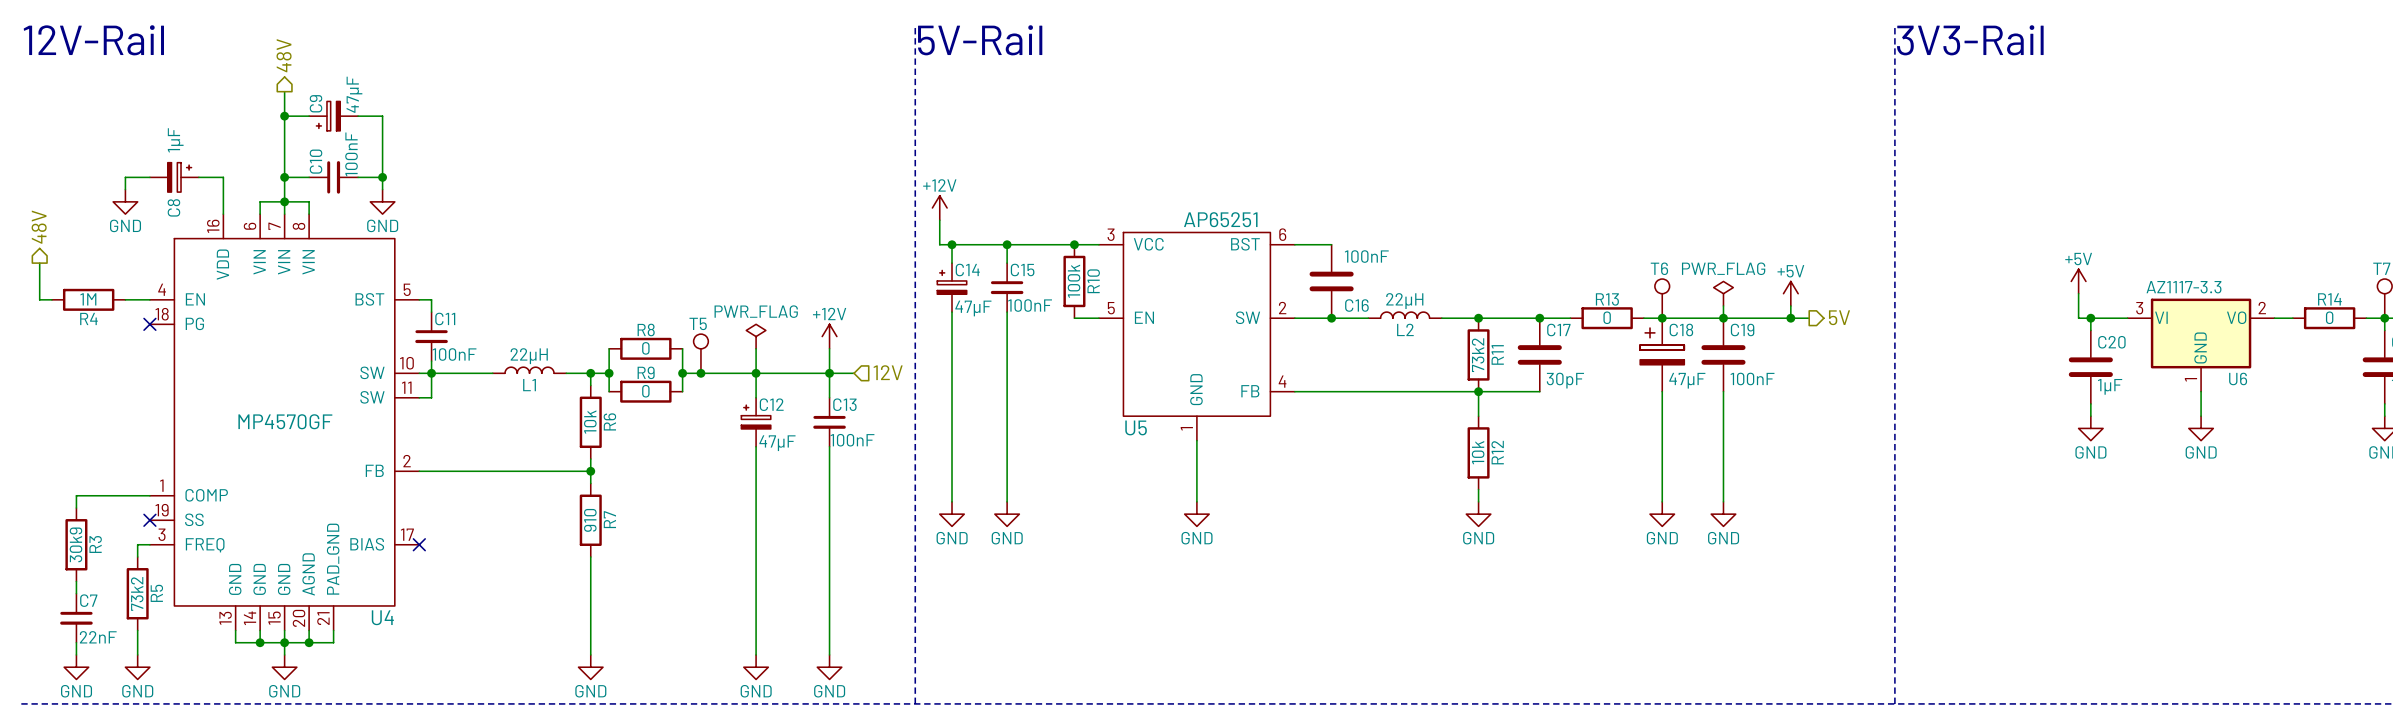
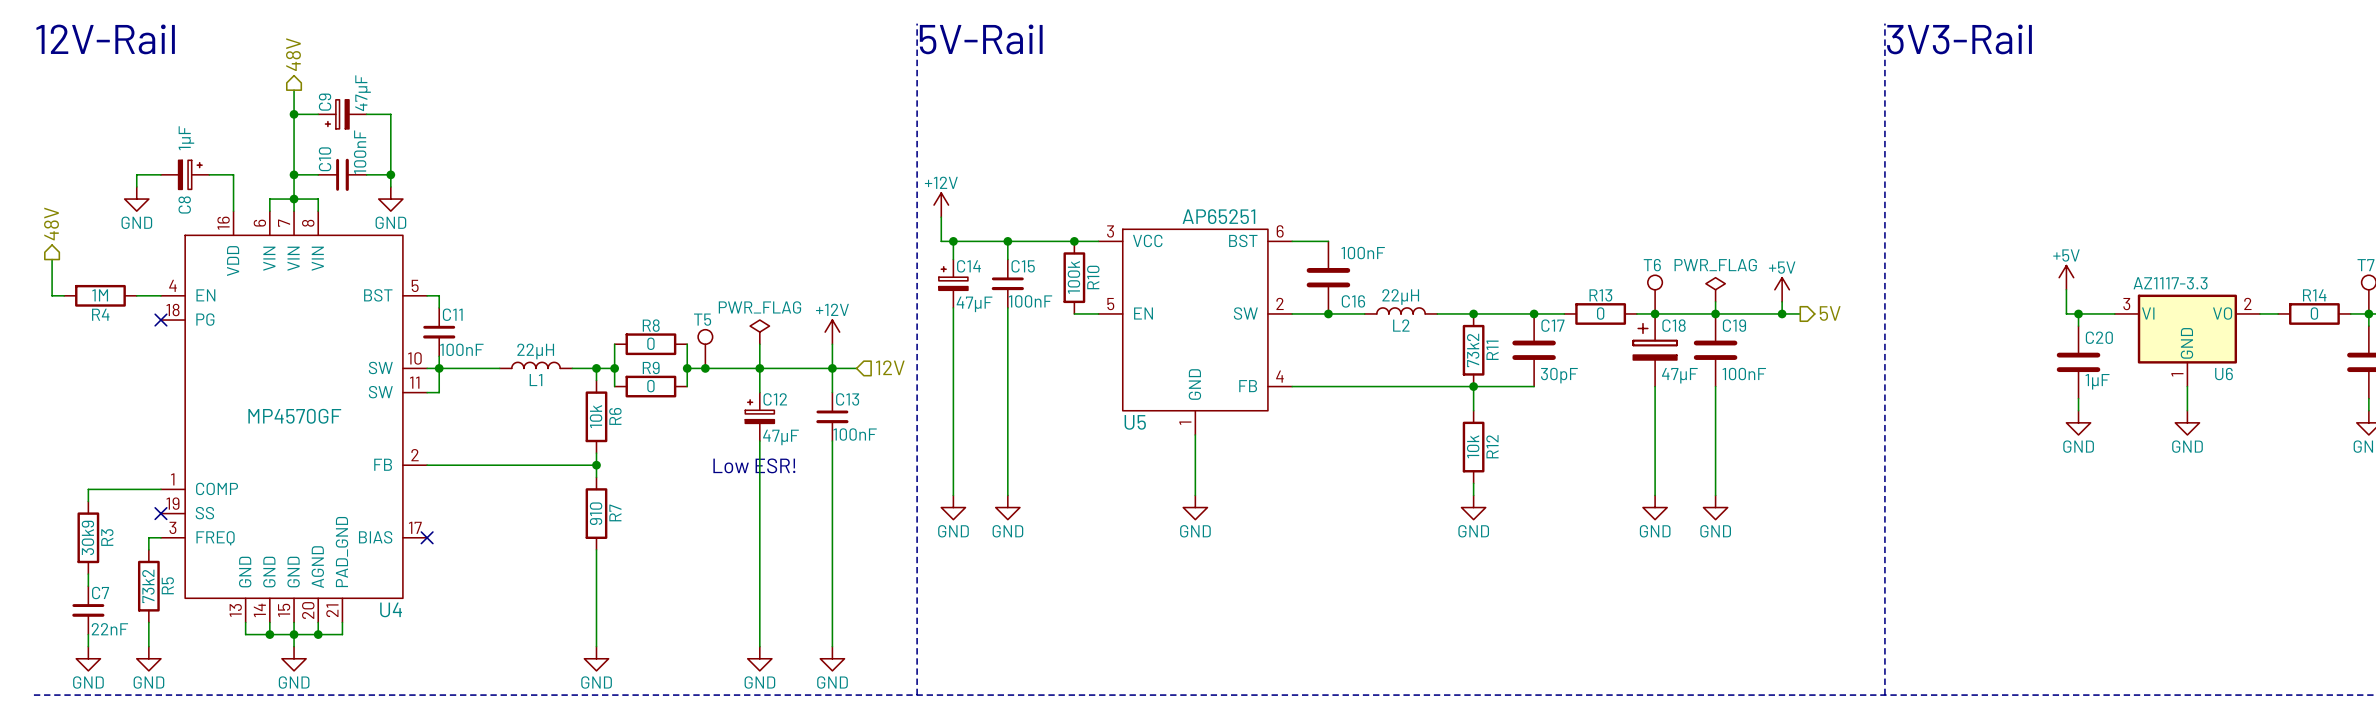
text: none -> Low ESR! (754, 465)

